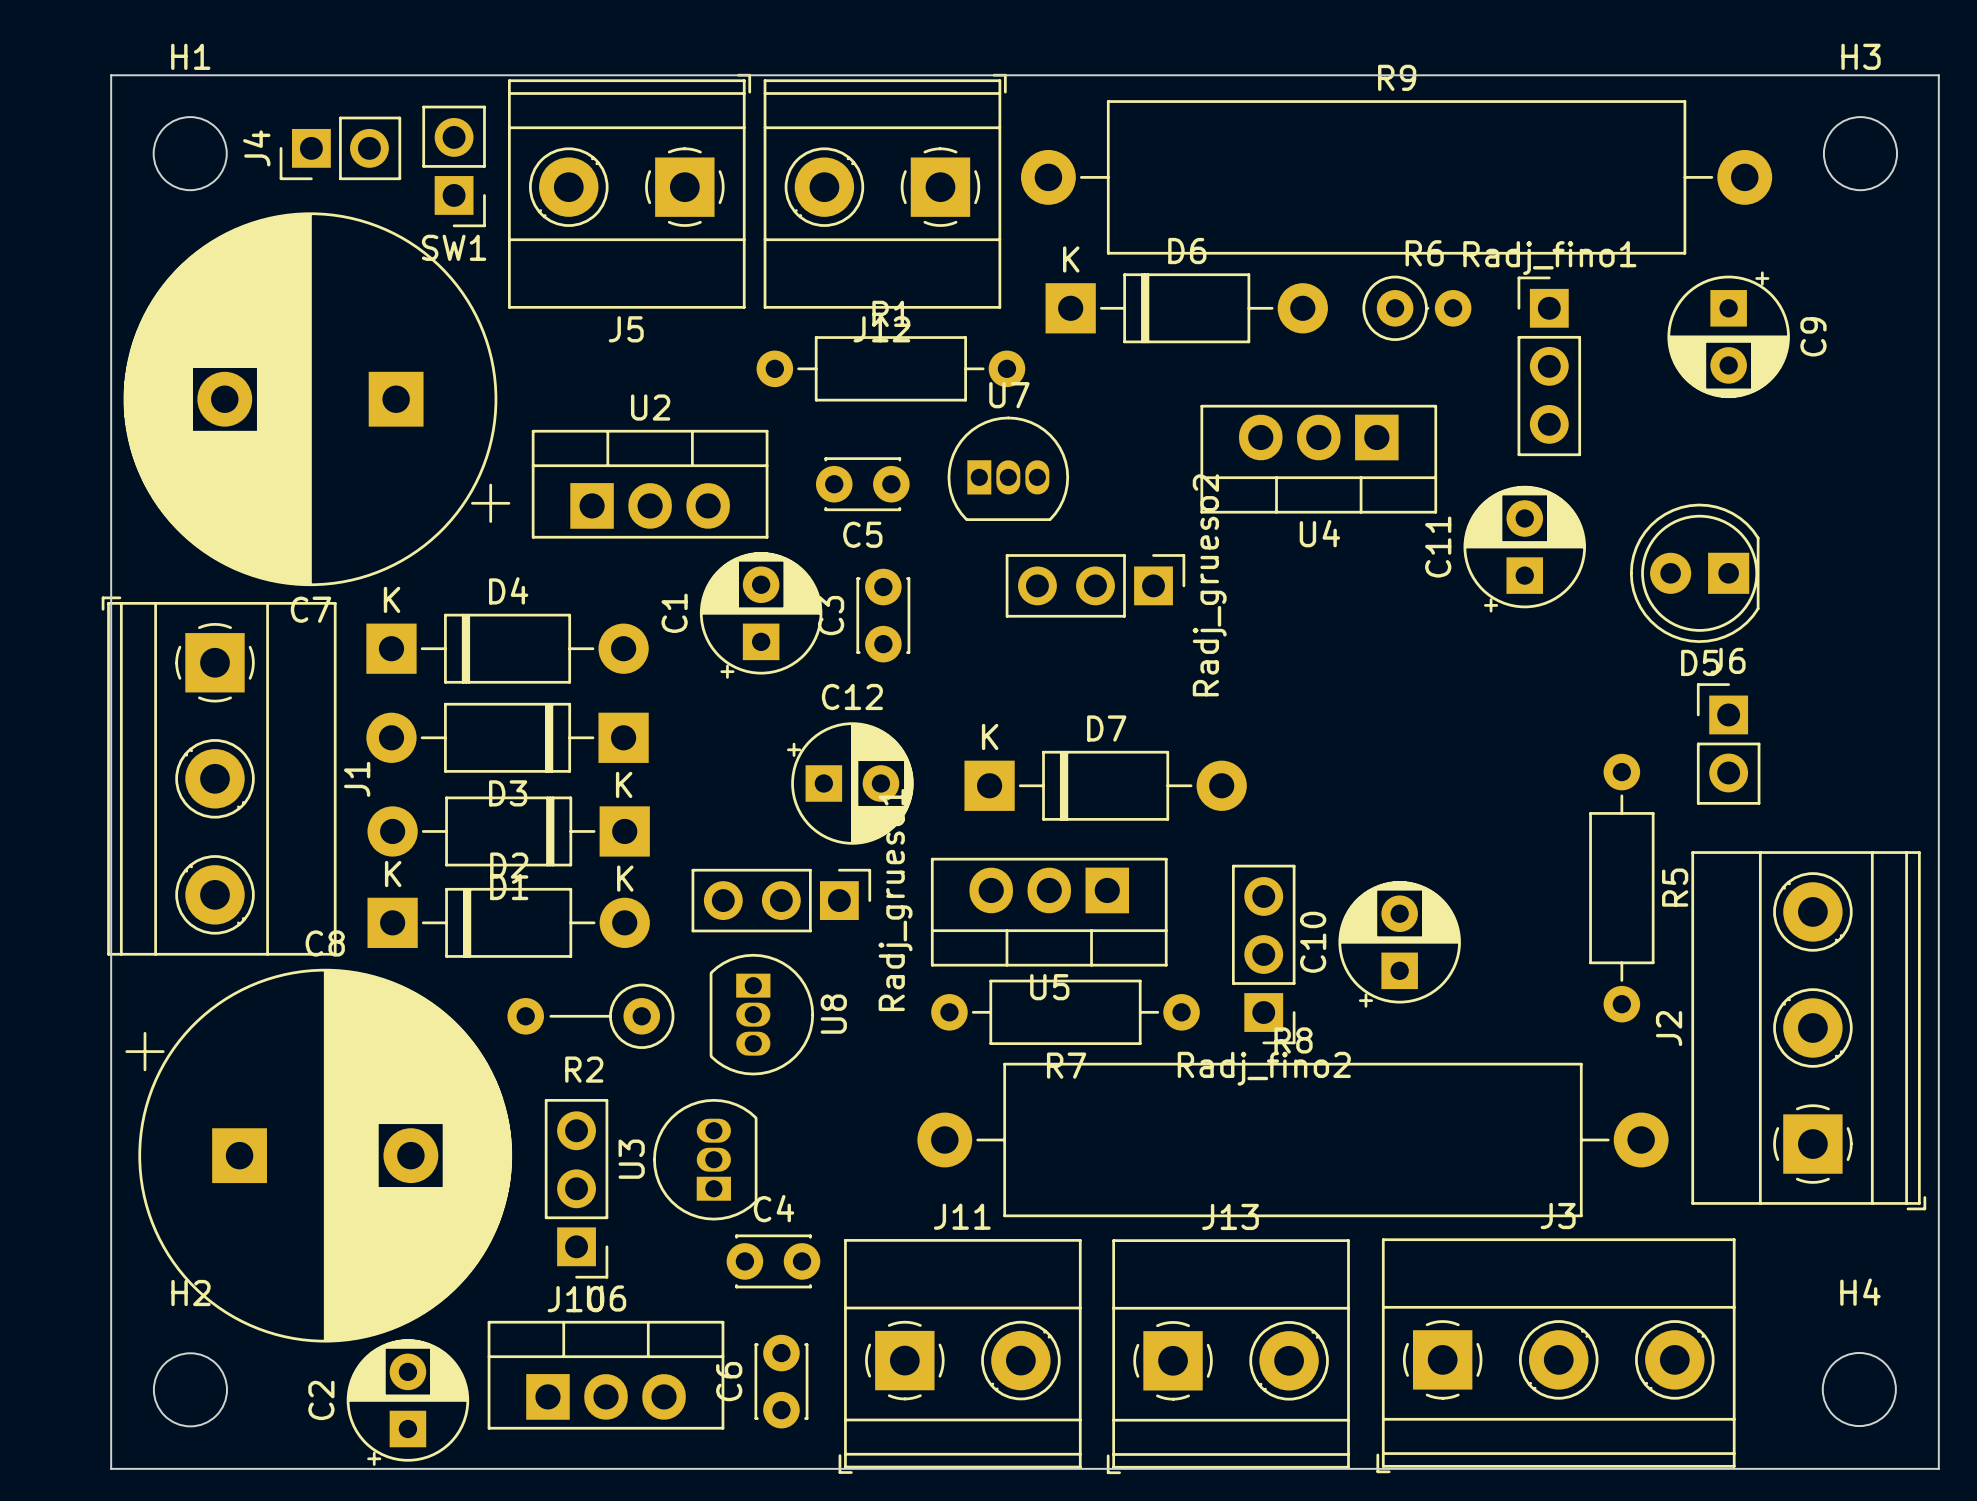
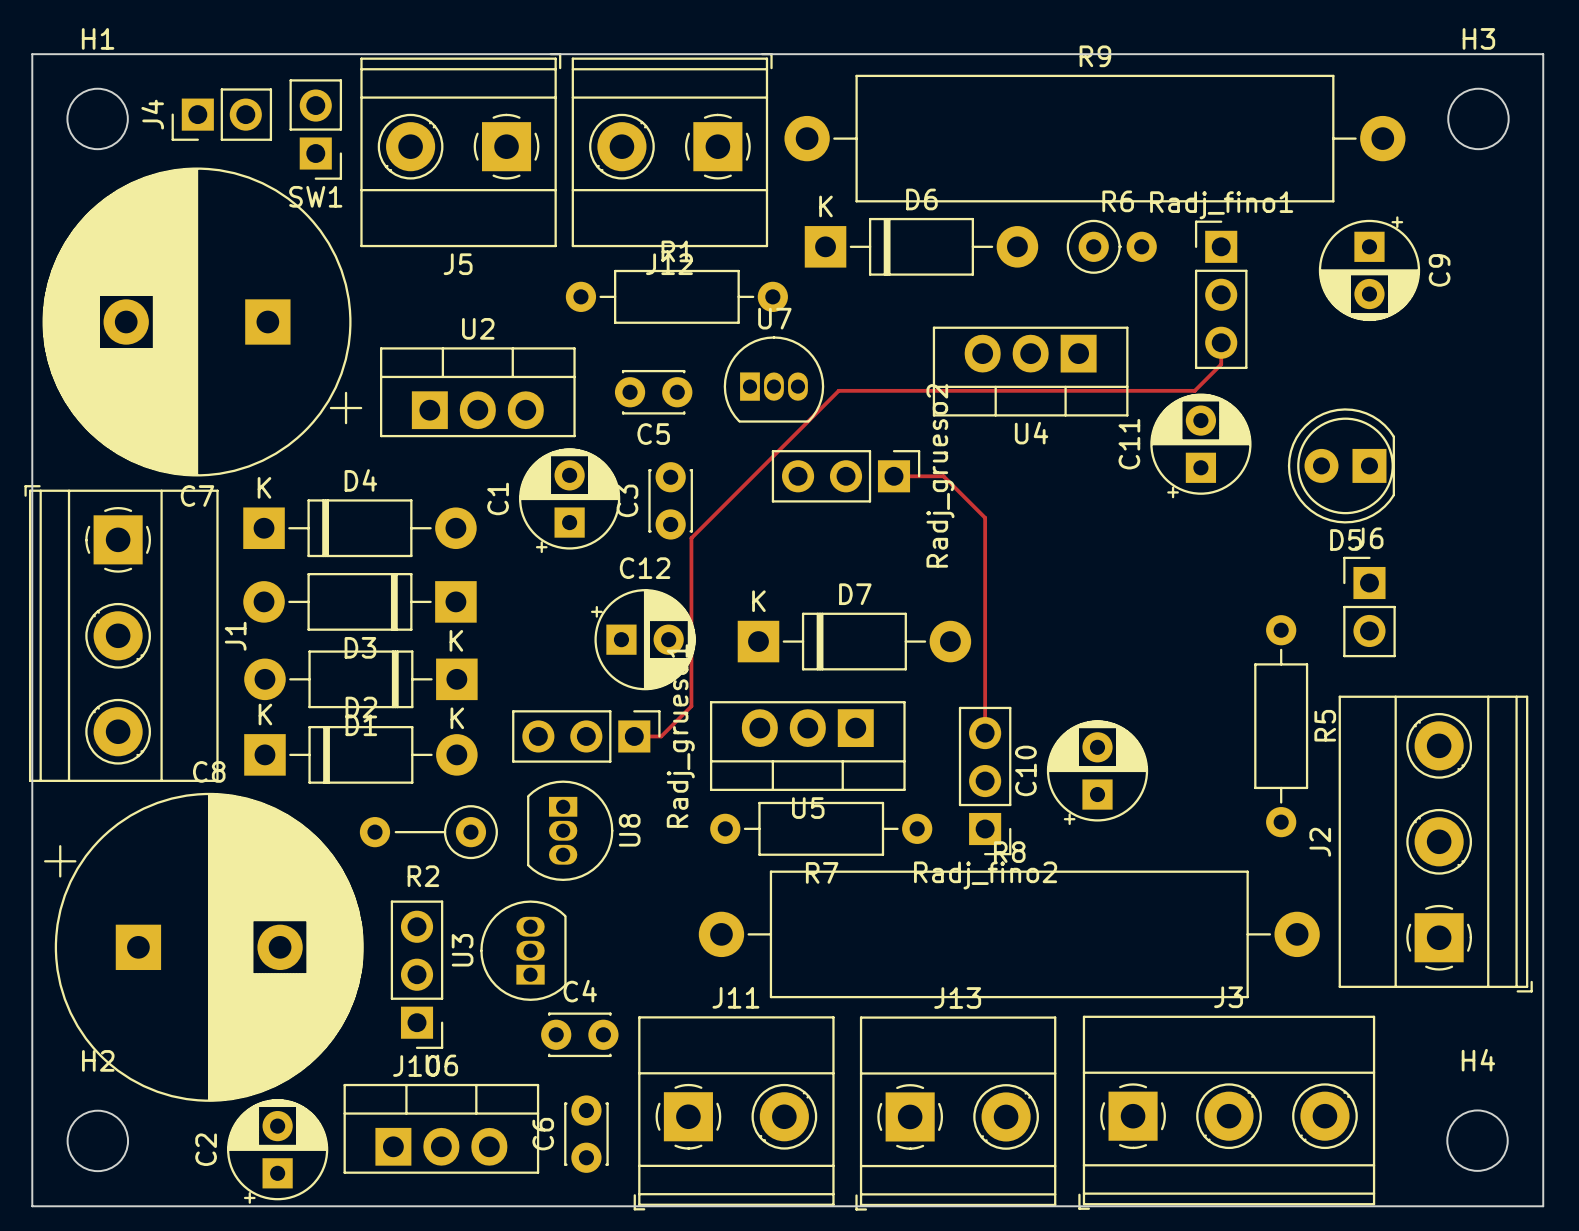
track: none -> (1221, 342) (1221, 364) (1194, 390) (838, 390) (691, 538) (691, 706) (661, 736) (634, 736)
track: none -> (894, 476) (943, 476) (985, 517) (985, 733)

